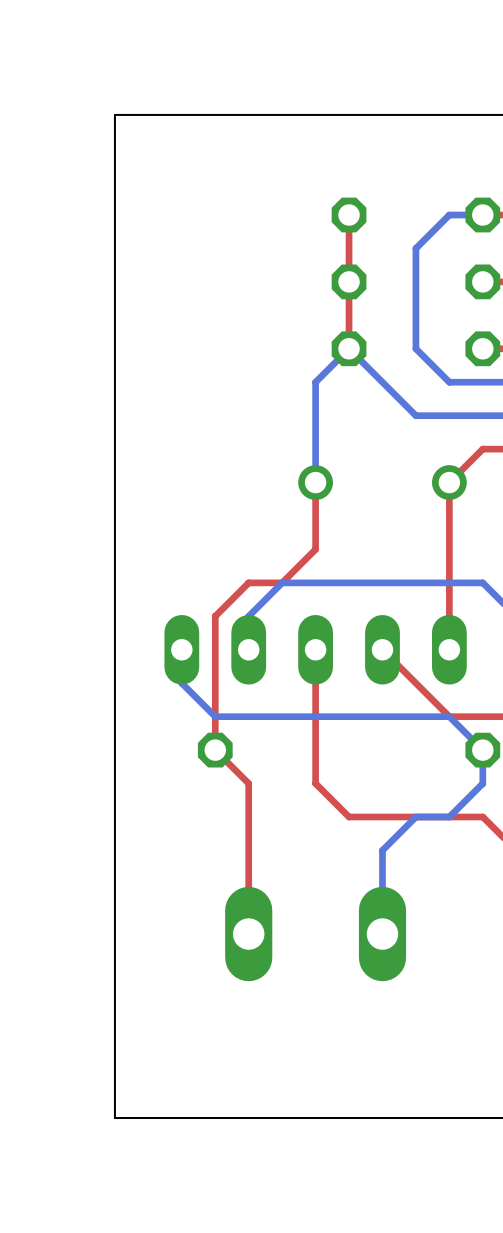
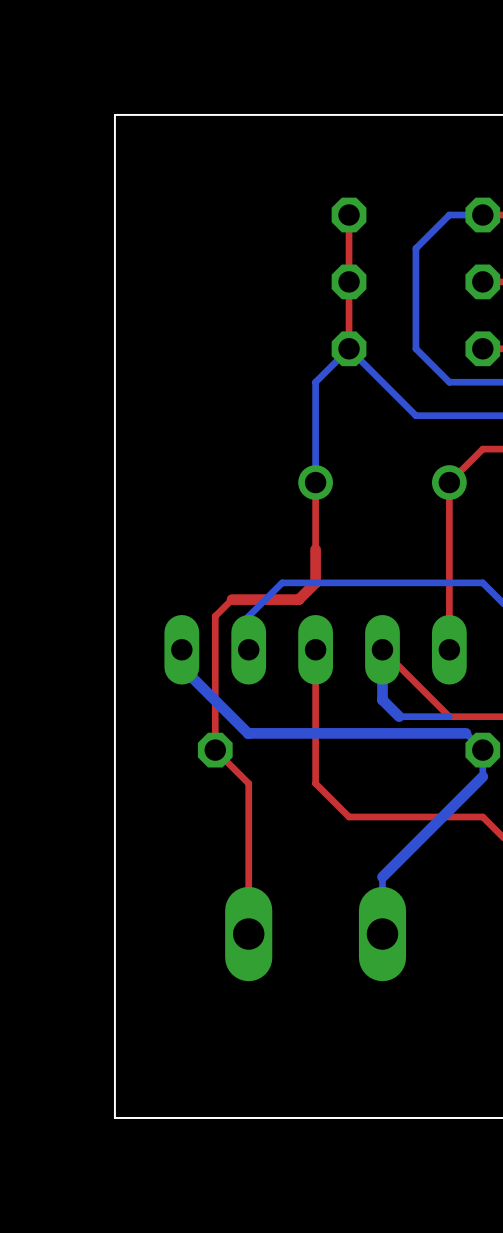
top track: (315, 549) (282, 582) (248, 582) (231, 599) -> (315, 549) (315, 582) (298, 599) (231, 599)
bottom track: none -> (382, 649) (382, 699) (399, 716)
bottom track: (181, 667) (181, 683) (215, 716) (399, 716) -> (181, 667) (248, 733)
bottom track: (449, 716) (466, 733) -> (248, 733) (466, 733)
bottom track: (482, 776) (482, 783) (449, 816) (415, 816) (382, 850) (382, 877) -> (482, 776) (382, 877)

